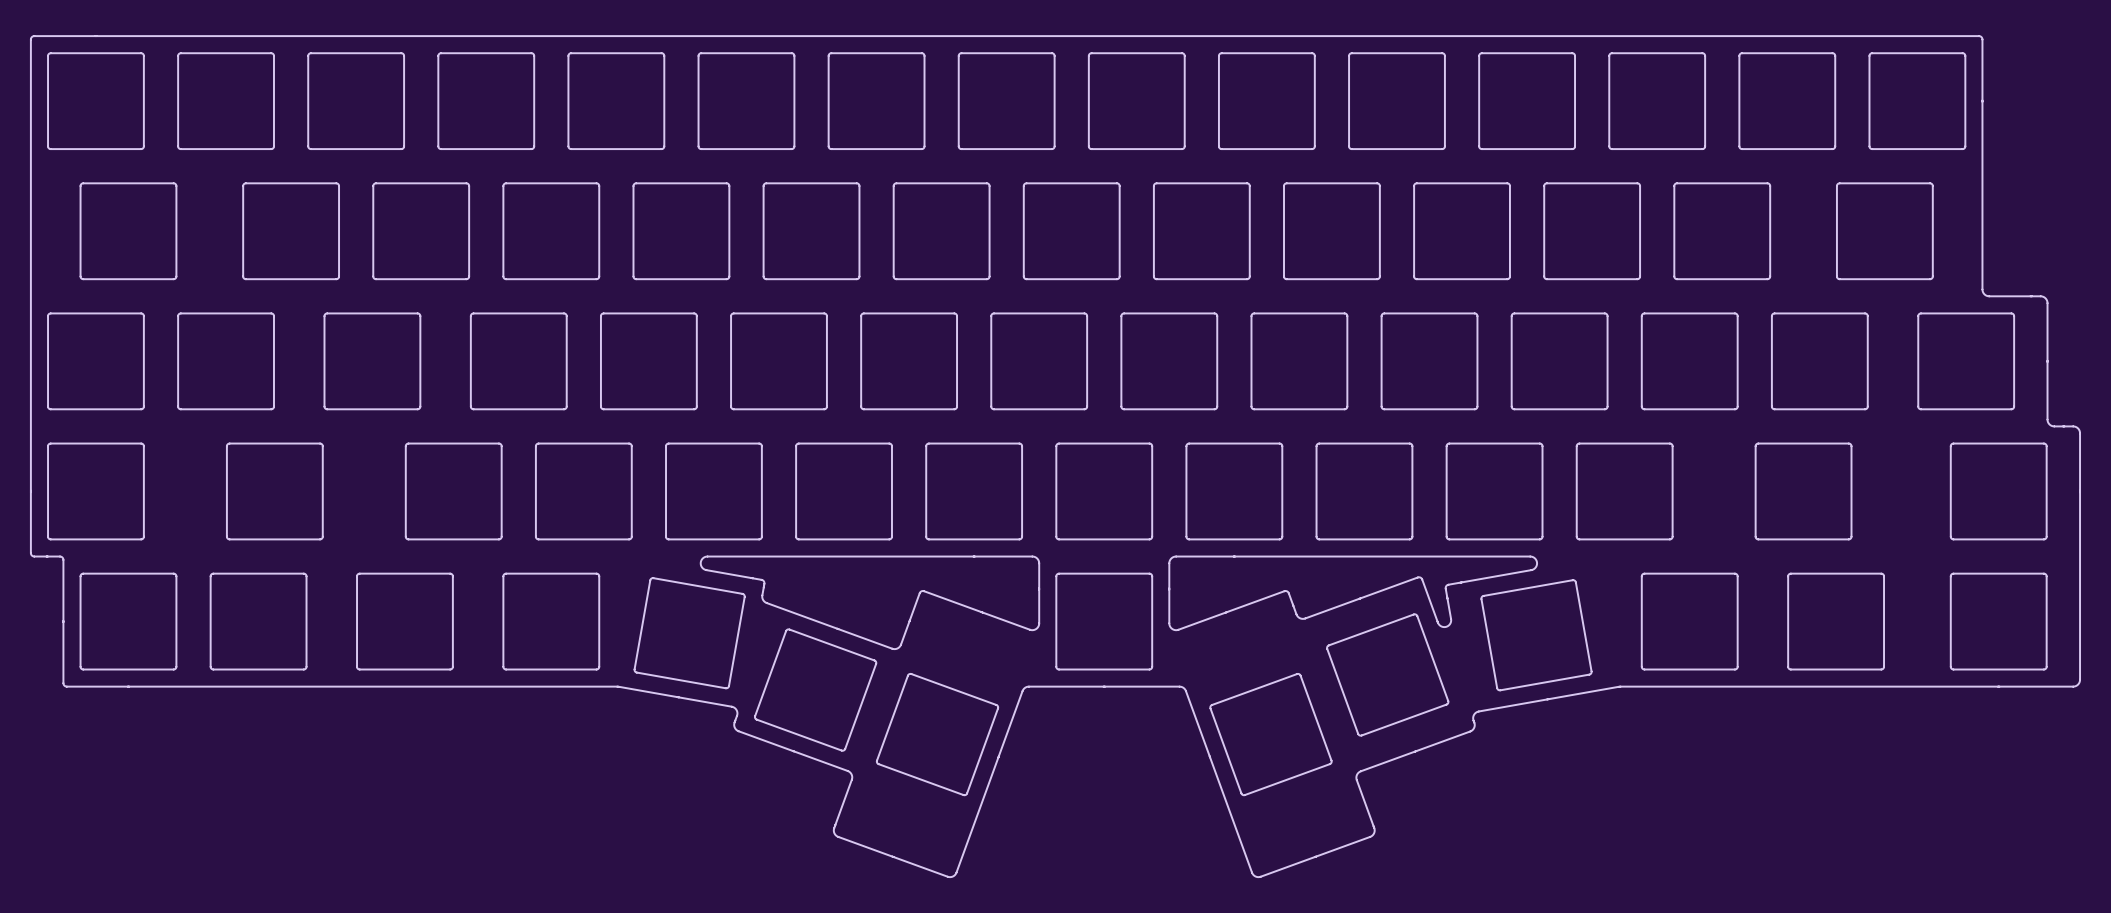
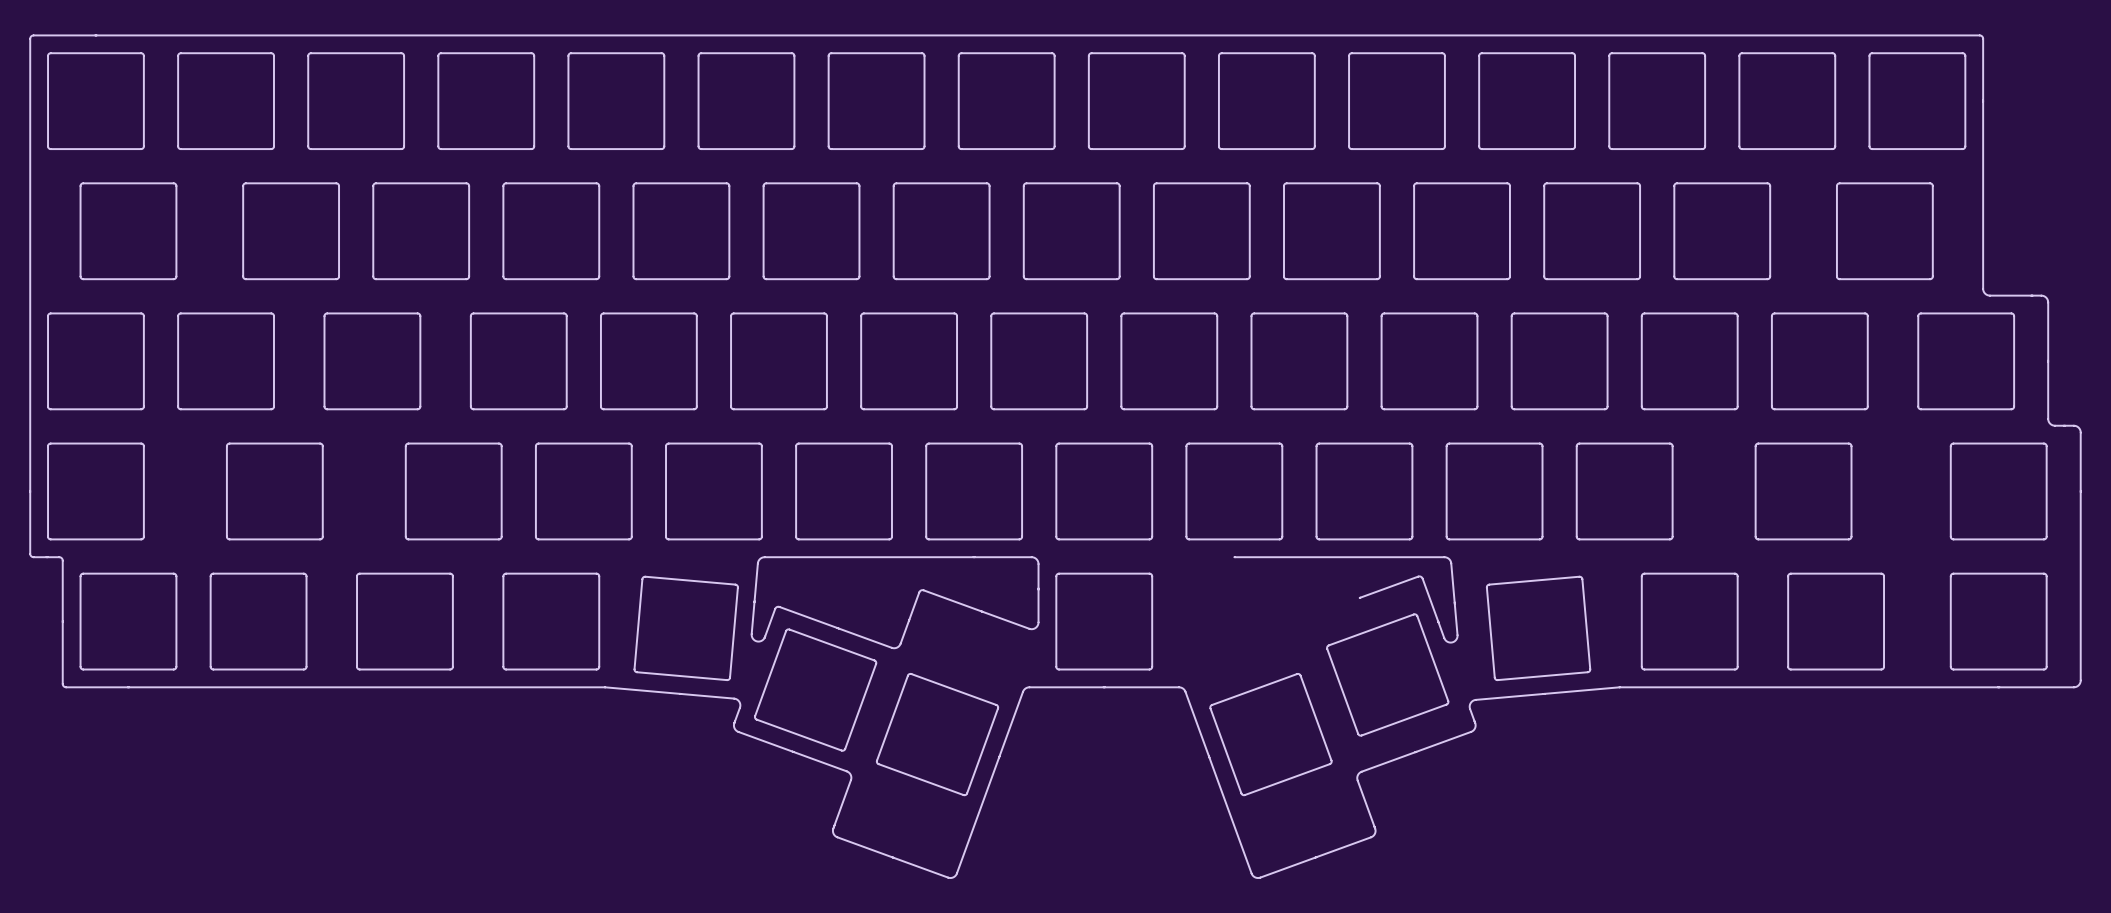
board edge: (1032, 556) (707, 556) (702, 558) (700, 563) (705, 569) (762, 580) (764, 583) (762, 597) (766, 602) (894, 649) (900, 645) (919, 593) (922, 591) (1030, 629) (1036, 628) (1039, 623) (1039, 563) (1037, 558) (1032, 556) -> none
board edge: none -> (1234, 557) (1446, 557) (1451, 563) (1456, 638) (1451, 642) (1444, 638) (1420, 576) (1359, 597)
drawing: none -> [1486, 576, 1591, 681]
drawing shape: [634, 577, 746, 689] -> [634, 576, 739, 681]
drawing: [1481, 579, 1593, 691] -> none
board edge: (1437, 622) (1444, 627) (1448, 625) (1451, 621) (1445, 588) (1447, 585) (1532, 569) (1536, 565) (1535, 559) (1530, 556) (1176, 556) (1169, 561) (1169, 624) (1174, 629) (1285, 591) (1288, 592) (1297, 615) (1304, 618) (1418, 577) (1422, 579) (1437, 622) -> none
board edge: none -> (764, 637) (761, 640) (757, 641) (751, 635) (757, 563) (763, 557) (1031, 557) (1038, 562) (1038, 623) (1033, 628) (922, 590) (919, 592) (900, 644) (896, 647) (778, 606) (775, 608) (764, 637)
board edge: (737, 715) (736, 710) (732, 706) (617, 686) (64, 685) (63, 559) (60, 556) (33, 556) (30, 553) (31, 37) (1979, 36) (1982, 38) (1982, 290) (1988, 296) (2040, 296) (2046, 299) (2047, 421) (2052, 426) (2075, 426) (2079, 432) (2080, 679) (2076, 685) (1620, 686) (1478, 711) (1473, 715) (1474, 726) (1470, 731) (1357, 773) (1356, 779) (1374, 828) (1372, 835) (1258, 877) (1252, 872) (1185, 691) (1181, 686) (1028, 686) (1024, 688) (956, 872) (950, 877) (836, 836) (834, 828) (852, 779) (850, 772) (738, 731) (734, 727) (734, 722) -> (737, 715) (740, 704) (734, 698) (605, 687) (63, 686) (62, 559) (59, 557) (33, 557) (30, 553) (31, 36) (1979, 35) (1982, 37) (1983, 290) (1989, 295) (2041, 295) (2047, 298) (2048, 420) (2053, 425) (2076, 426) (2080, 431) (2080, 680) (2076, 686) (1619, 687) (1475, 700) (1469, 705) (1475, 724) (1472, 731) (1358, 773) (1357, 779) (1375, 829) (1373, 836) (1258, 878) (1251, 873) (1185, 691) (1180, 687) (1029, 687) (1024, 689) (956, 873) (951, 877) (836, 836) (833, 829) (851, 779) (849, 773) (737, 731) (734, 727) (734, 722)

